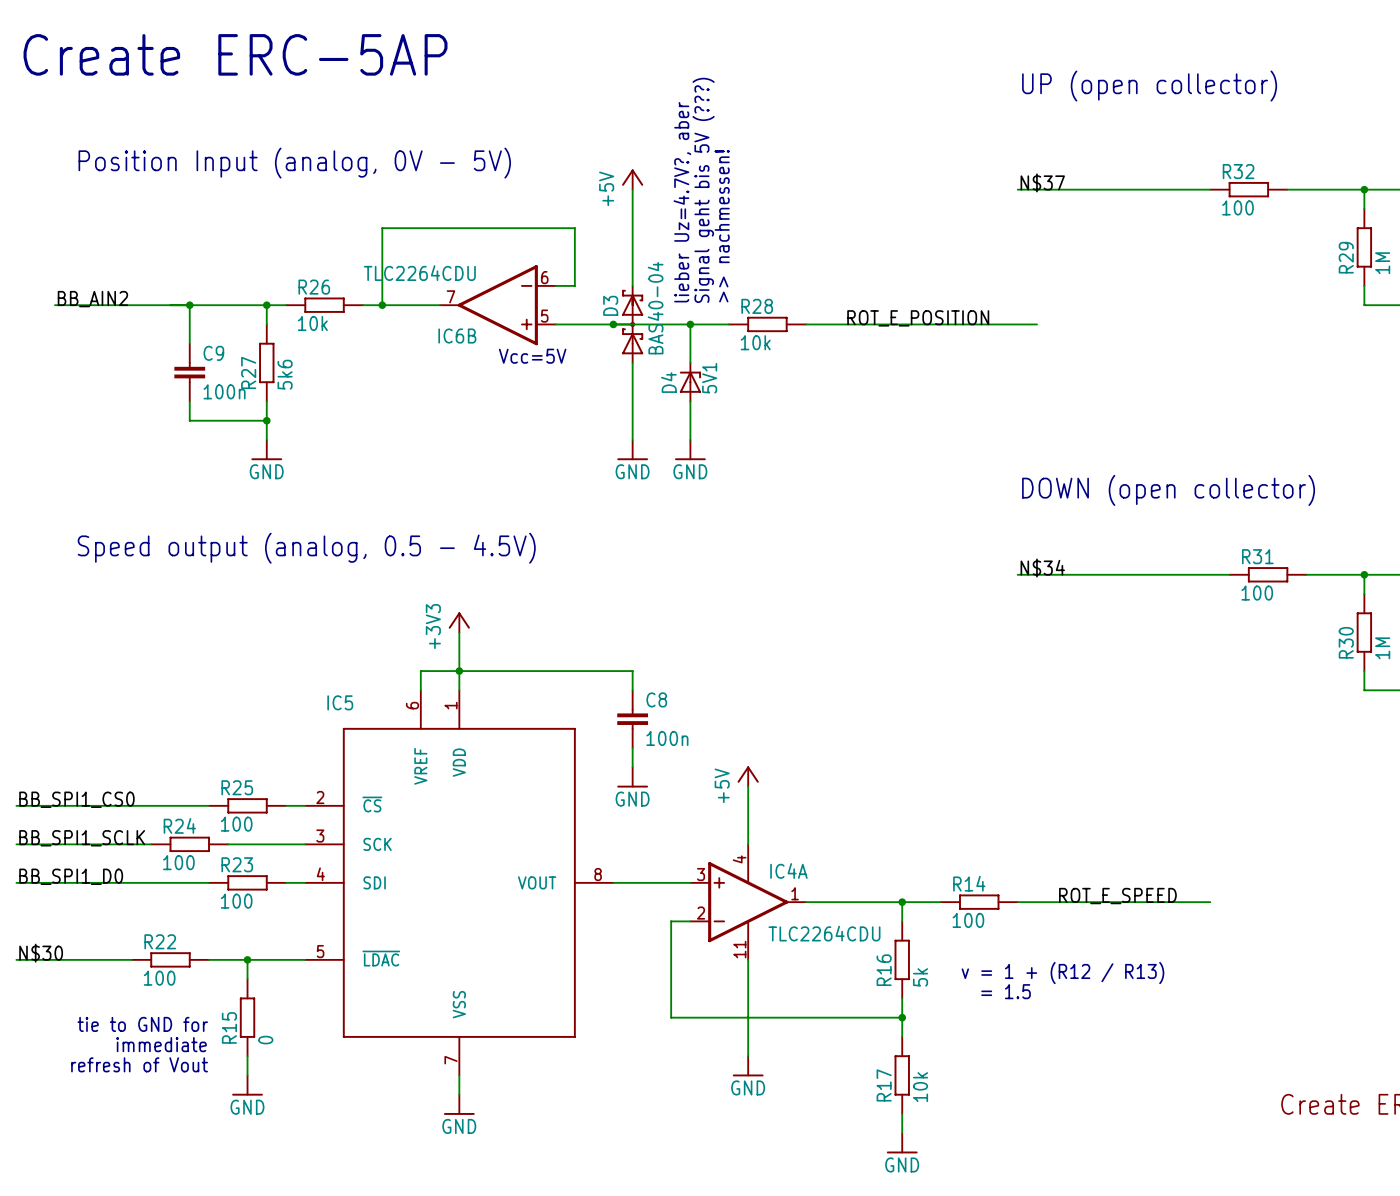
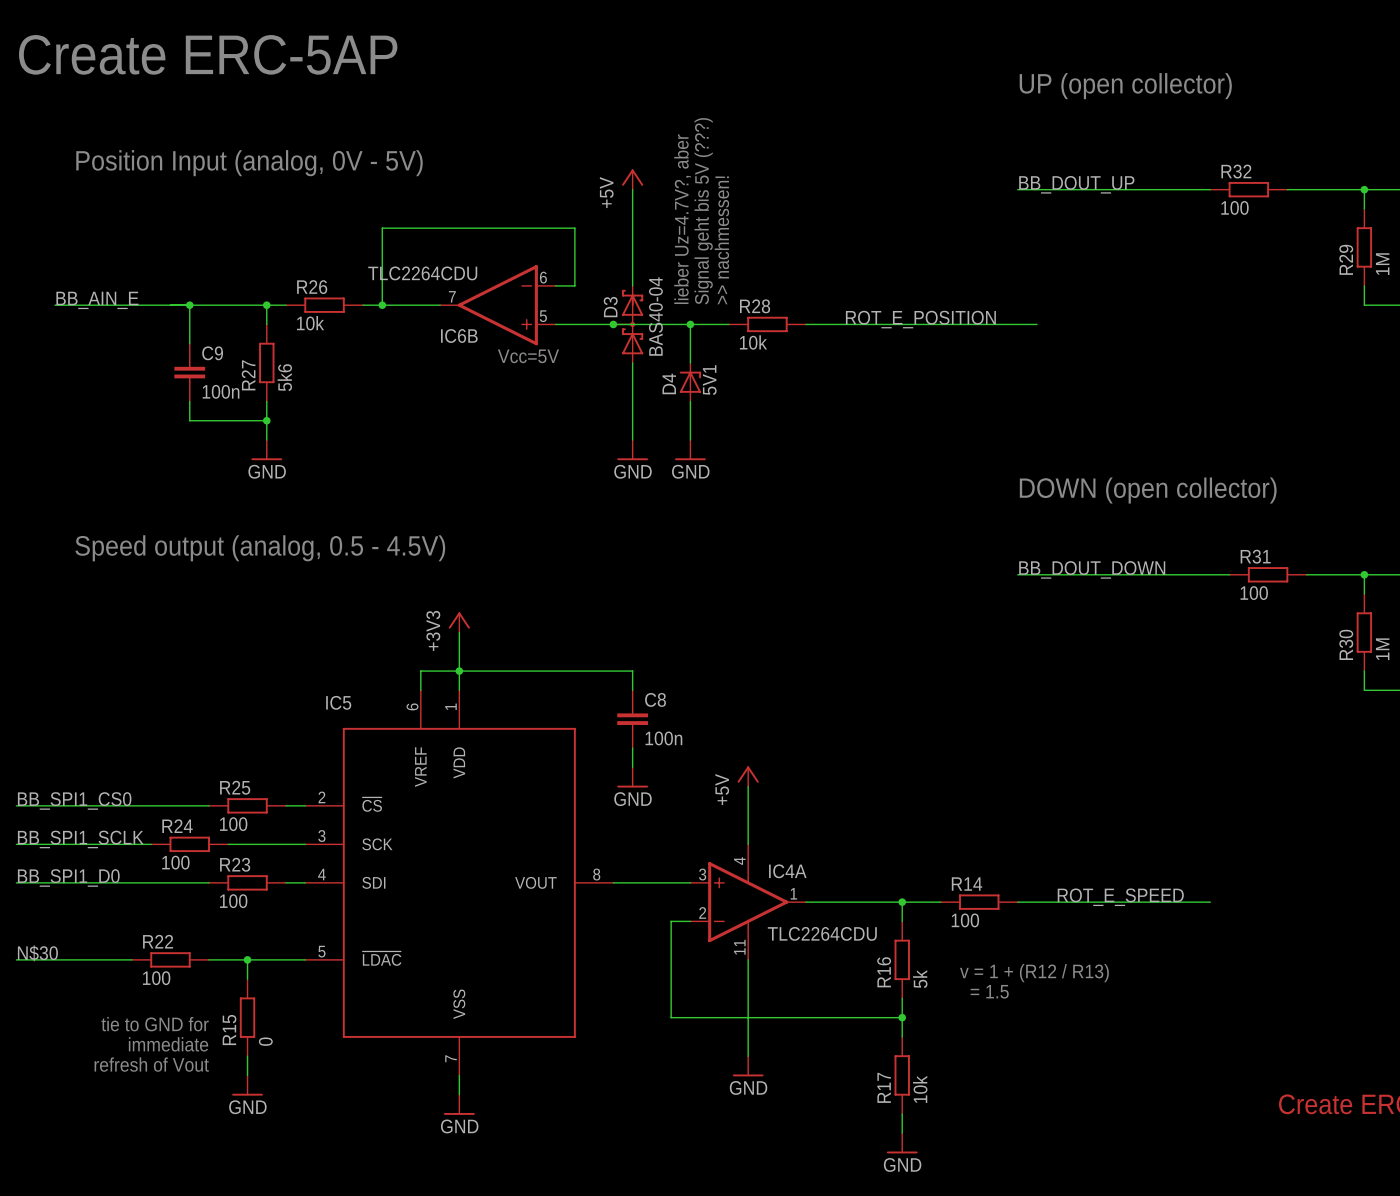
label: N$37 (1042, 182) -> BB_DOUT_UP (1076, 184)
label: BB_AIN2 (92, 299) -> BB_AIN_E (97, 300)
label: N$34 (1042, 568) -> BB_DOUT_DOWN (1092, 569)

